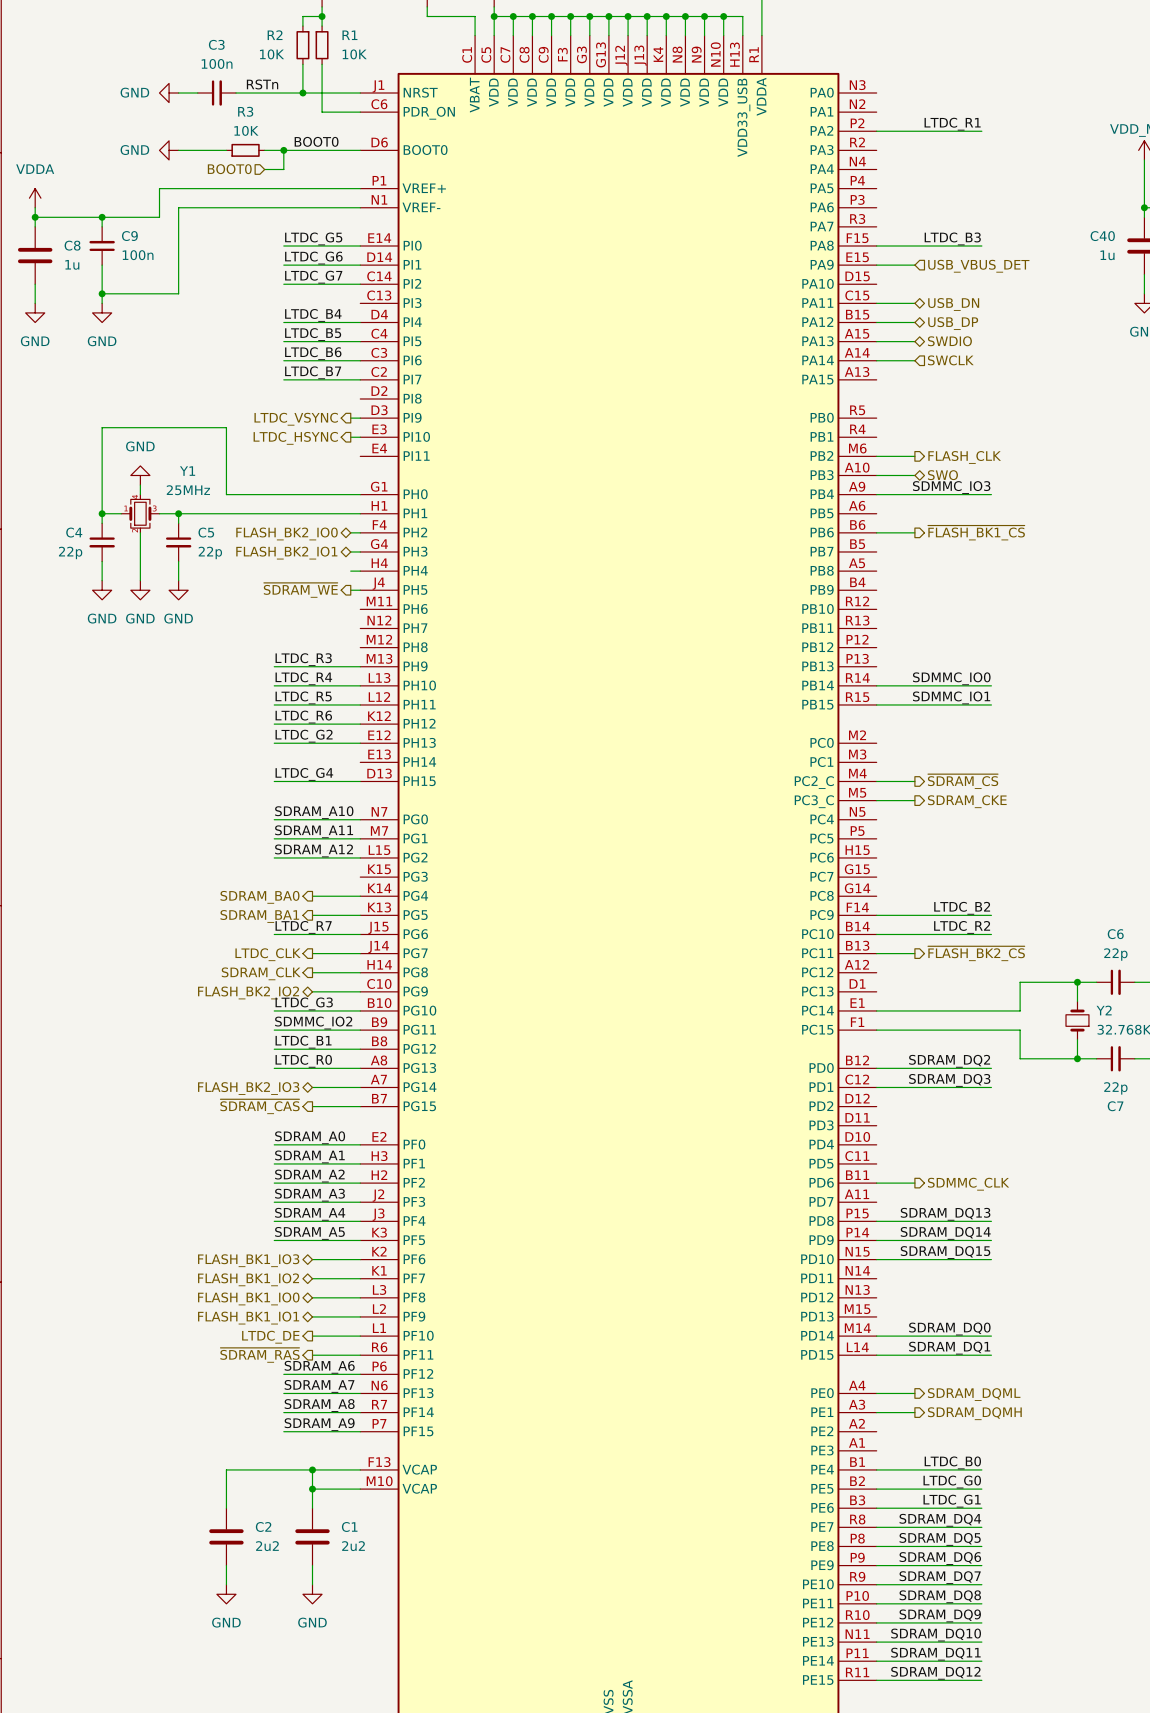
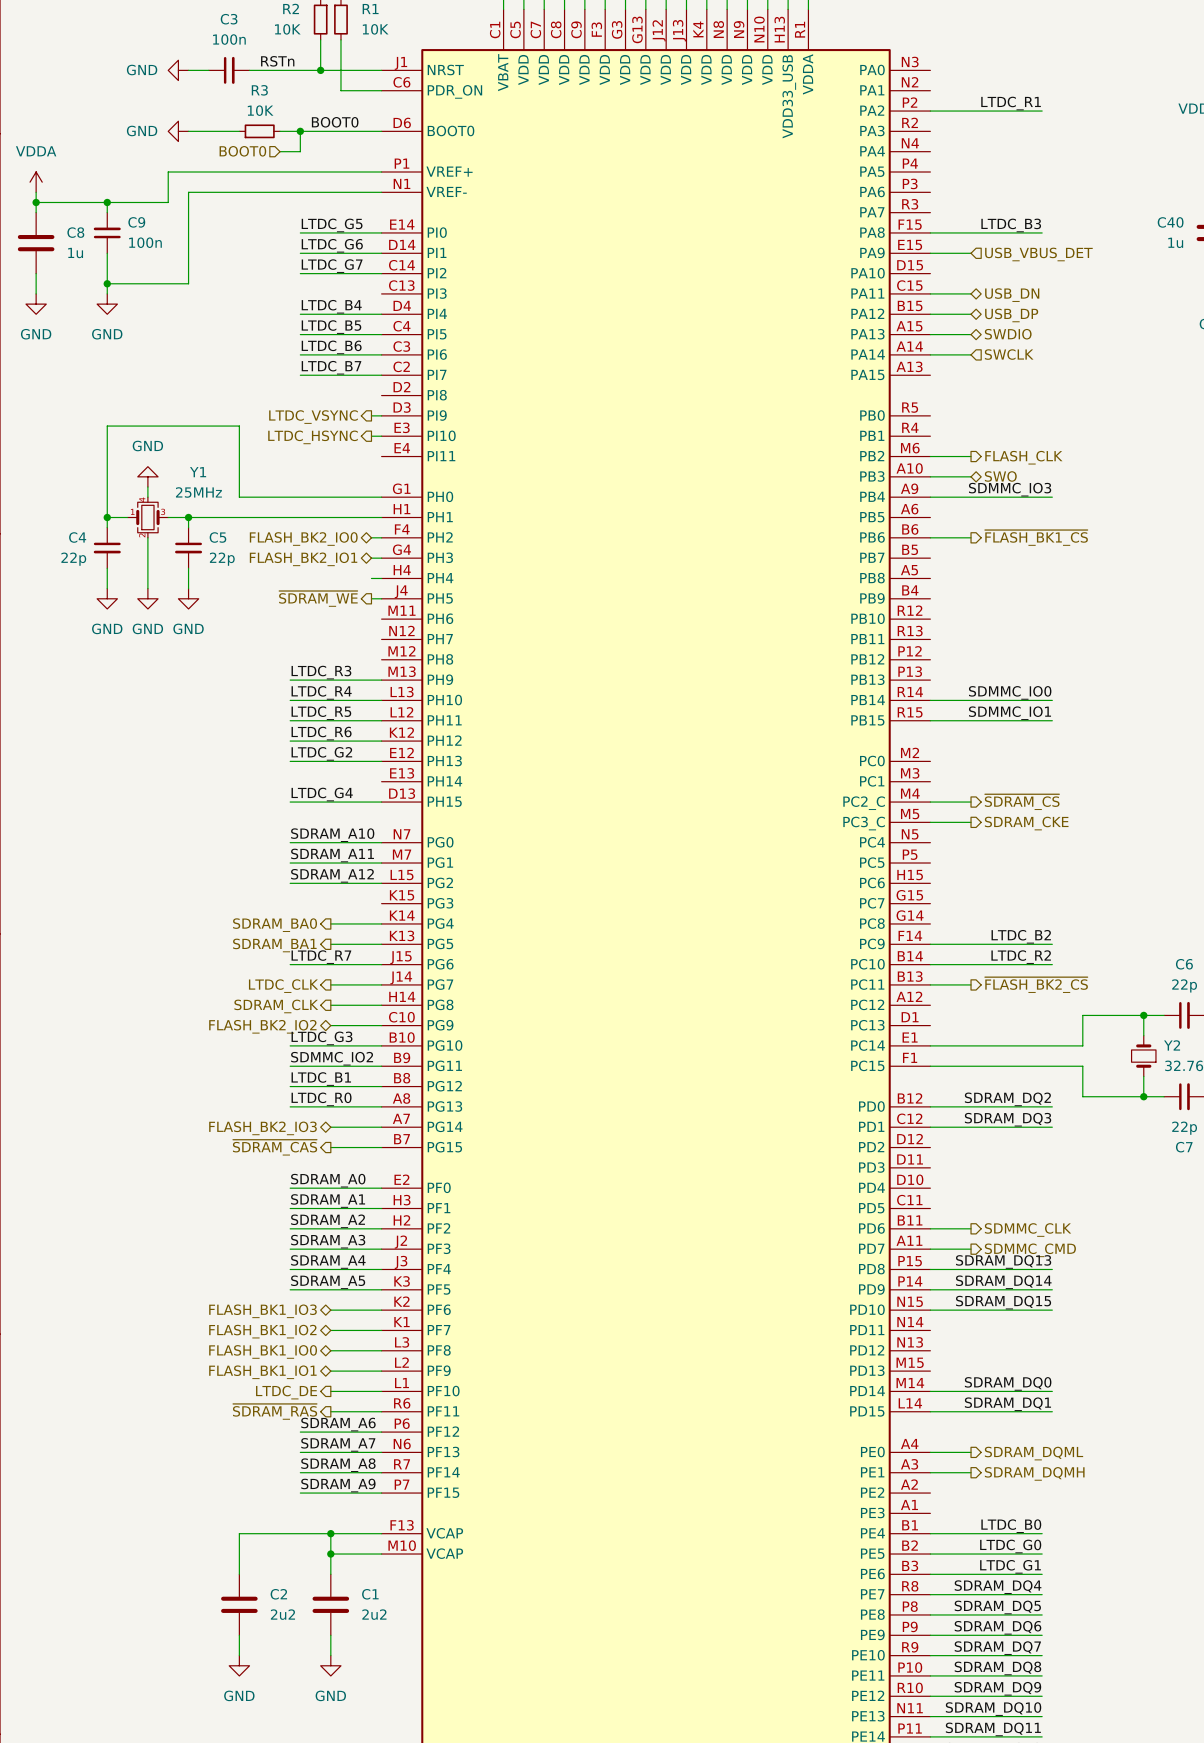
wire: none -> (930, 1249) (971, 1249)
hierarchical label: none -> SDMMC_CMD (1030, 1250)

